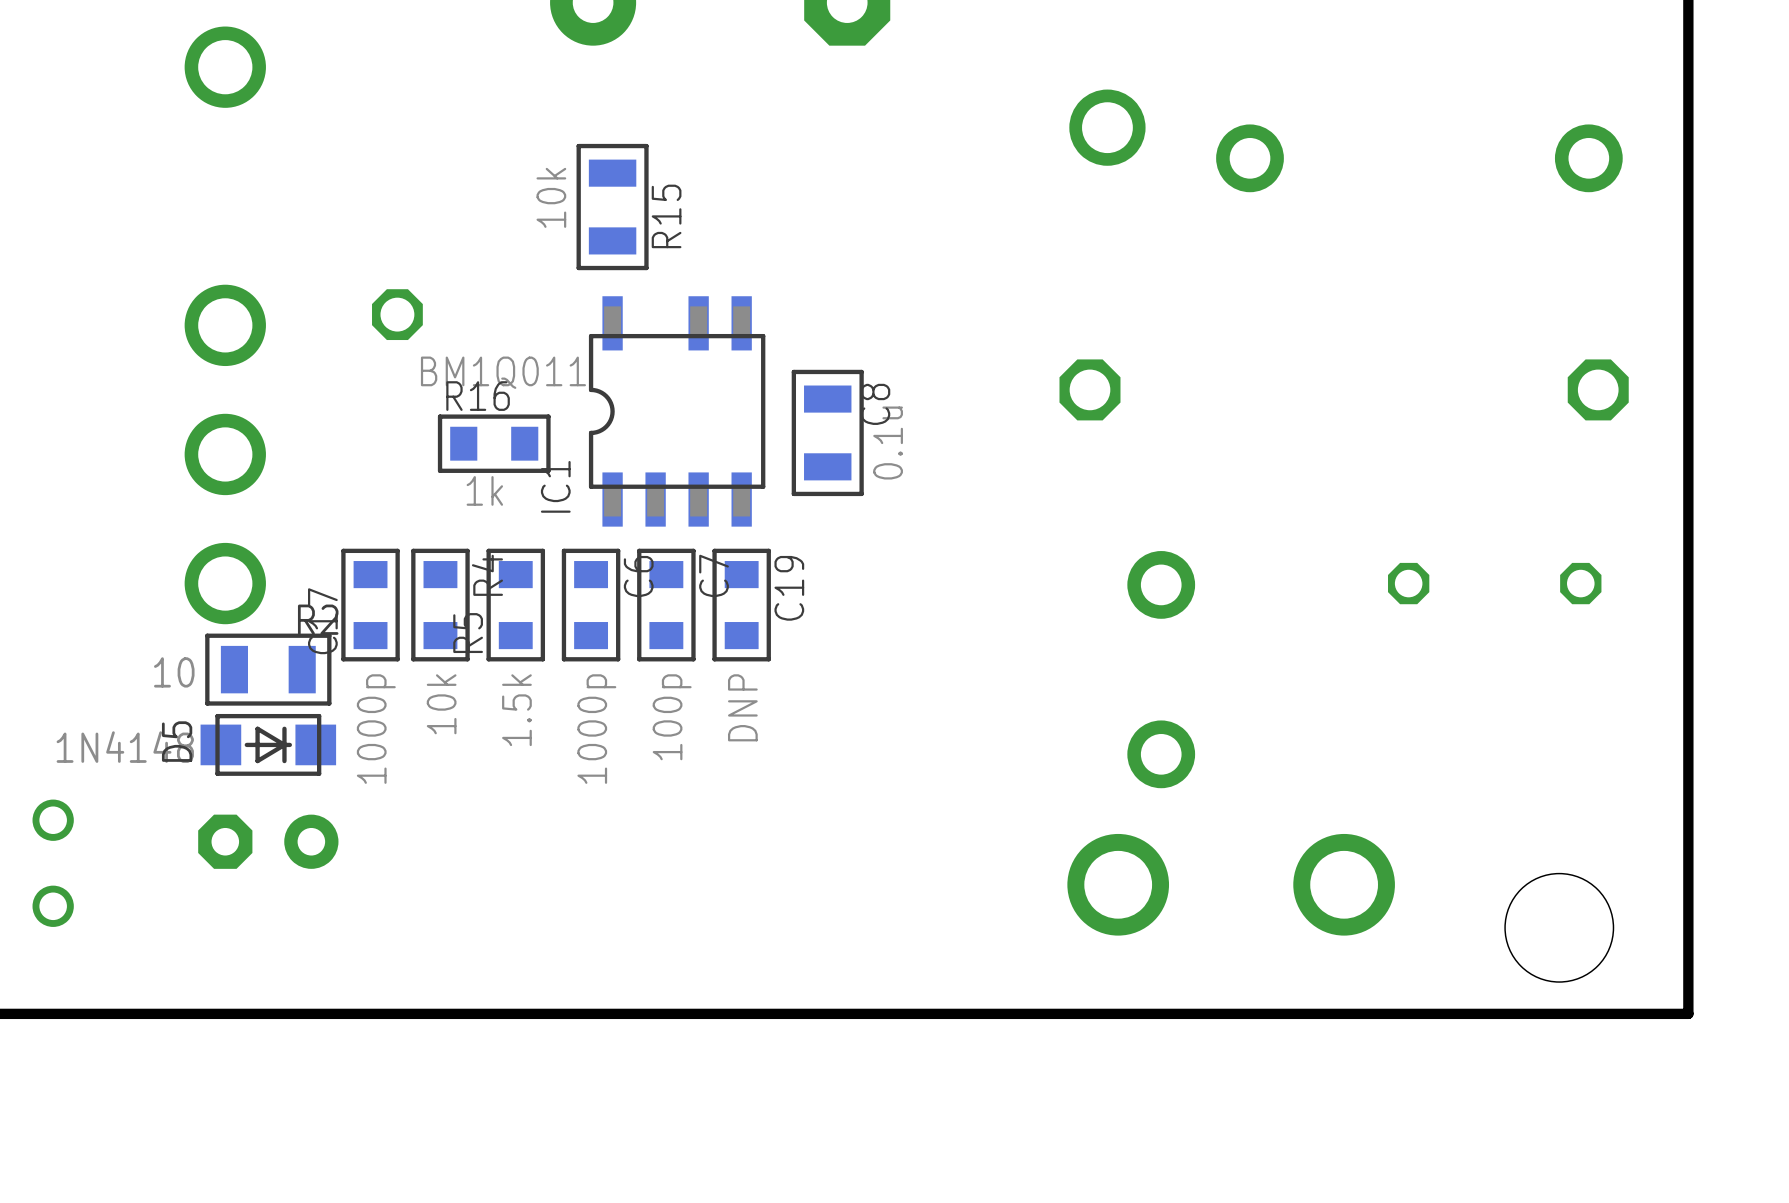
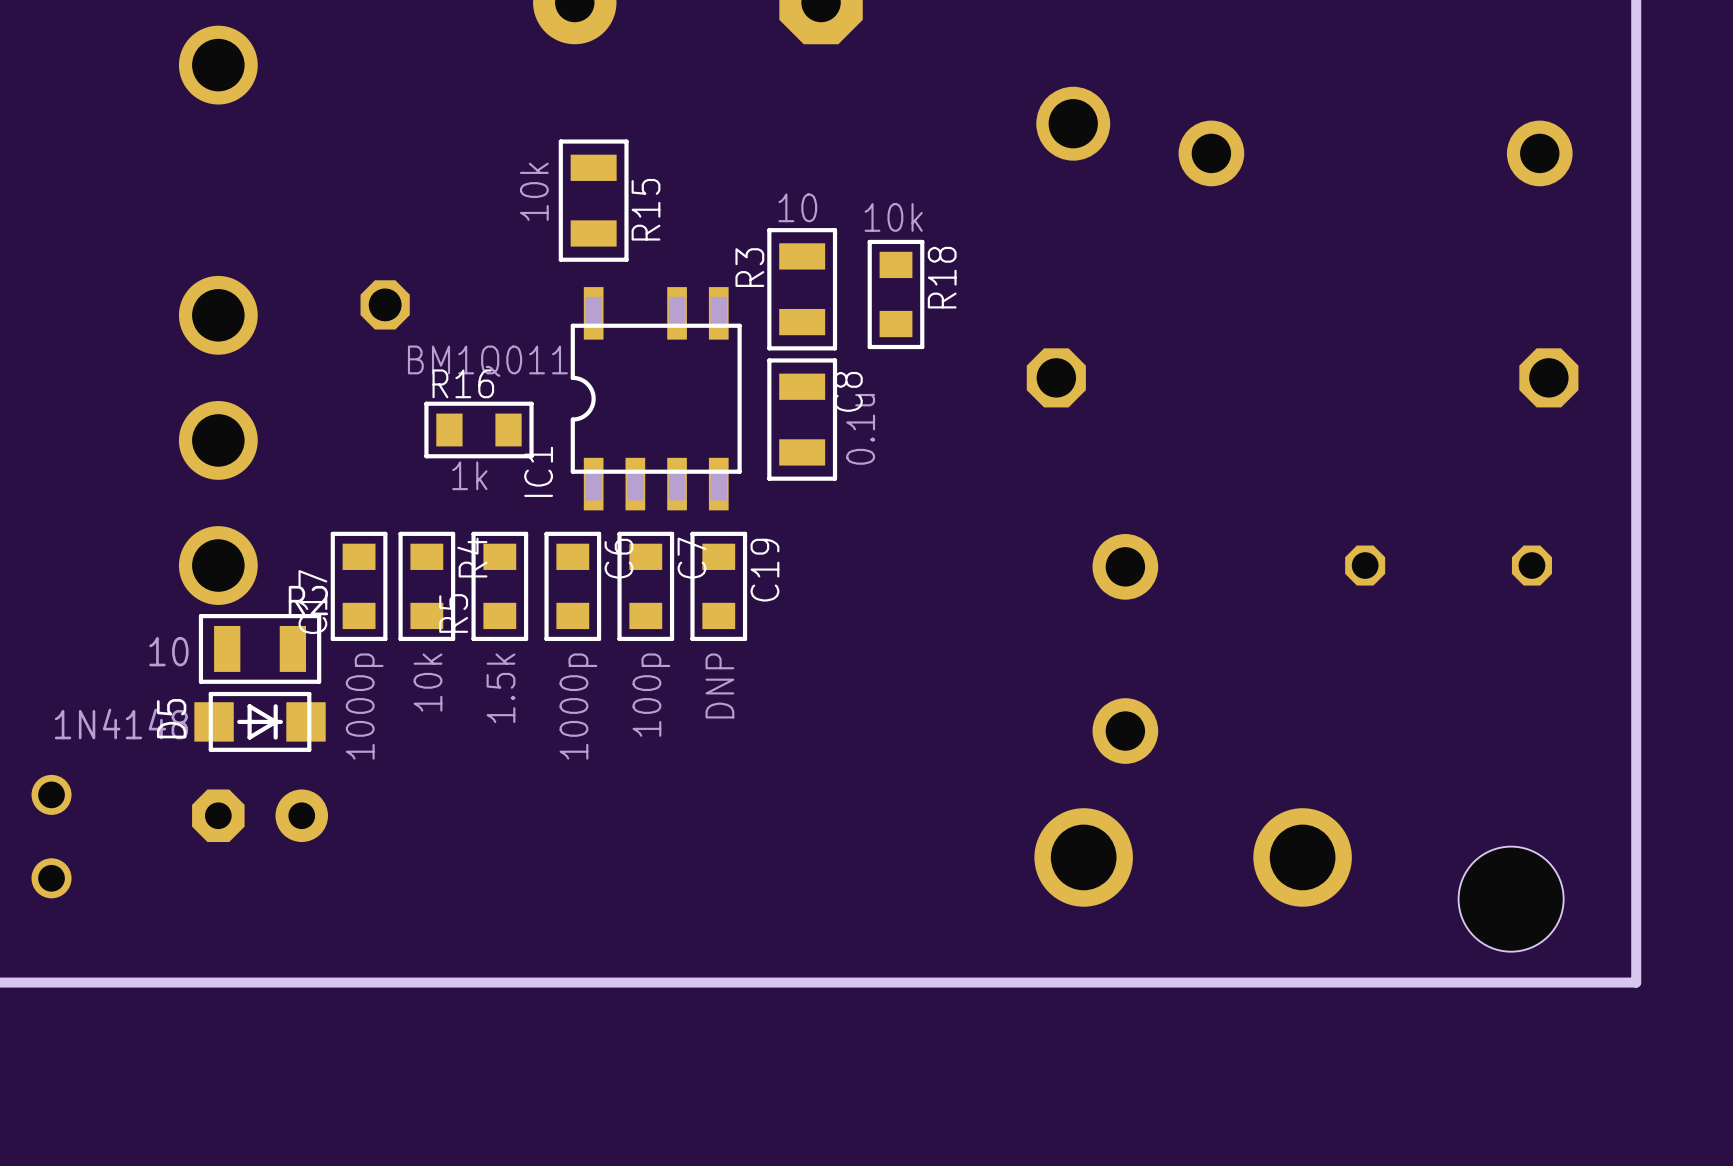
R3: none -> 10 (802, 289)
R18: none -> 10k (896, 294)

